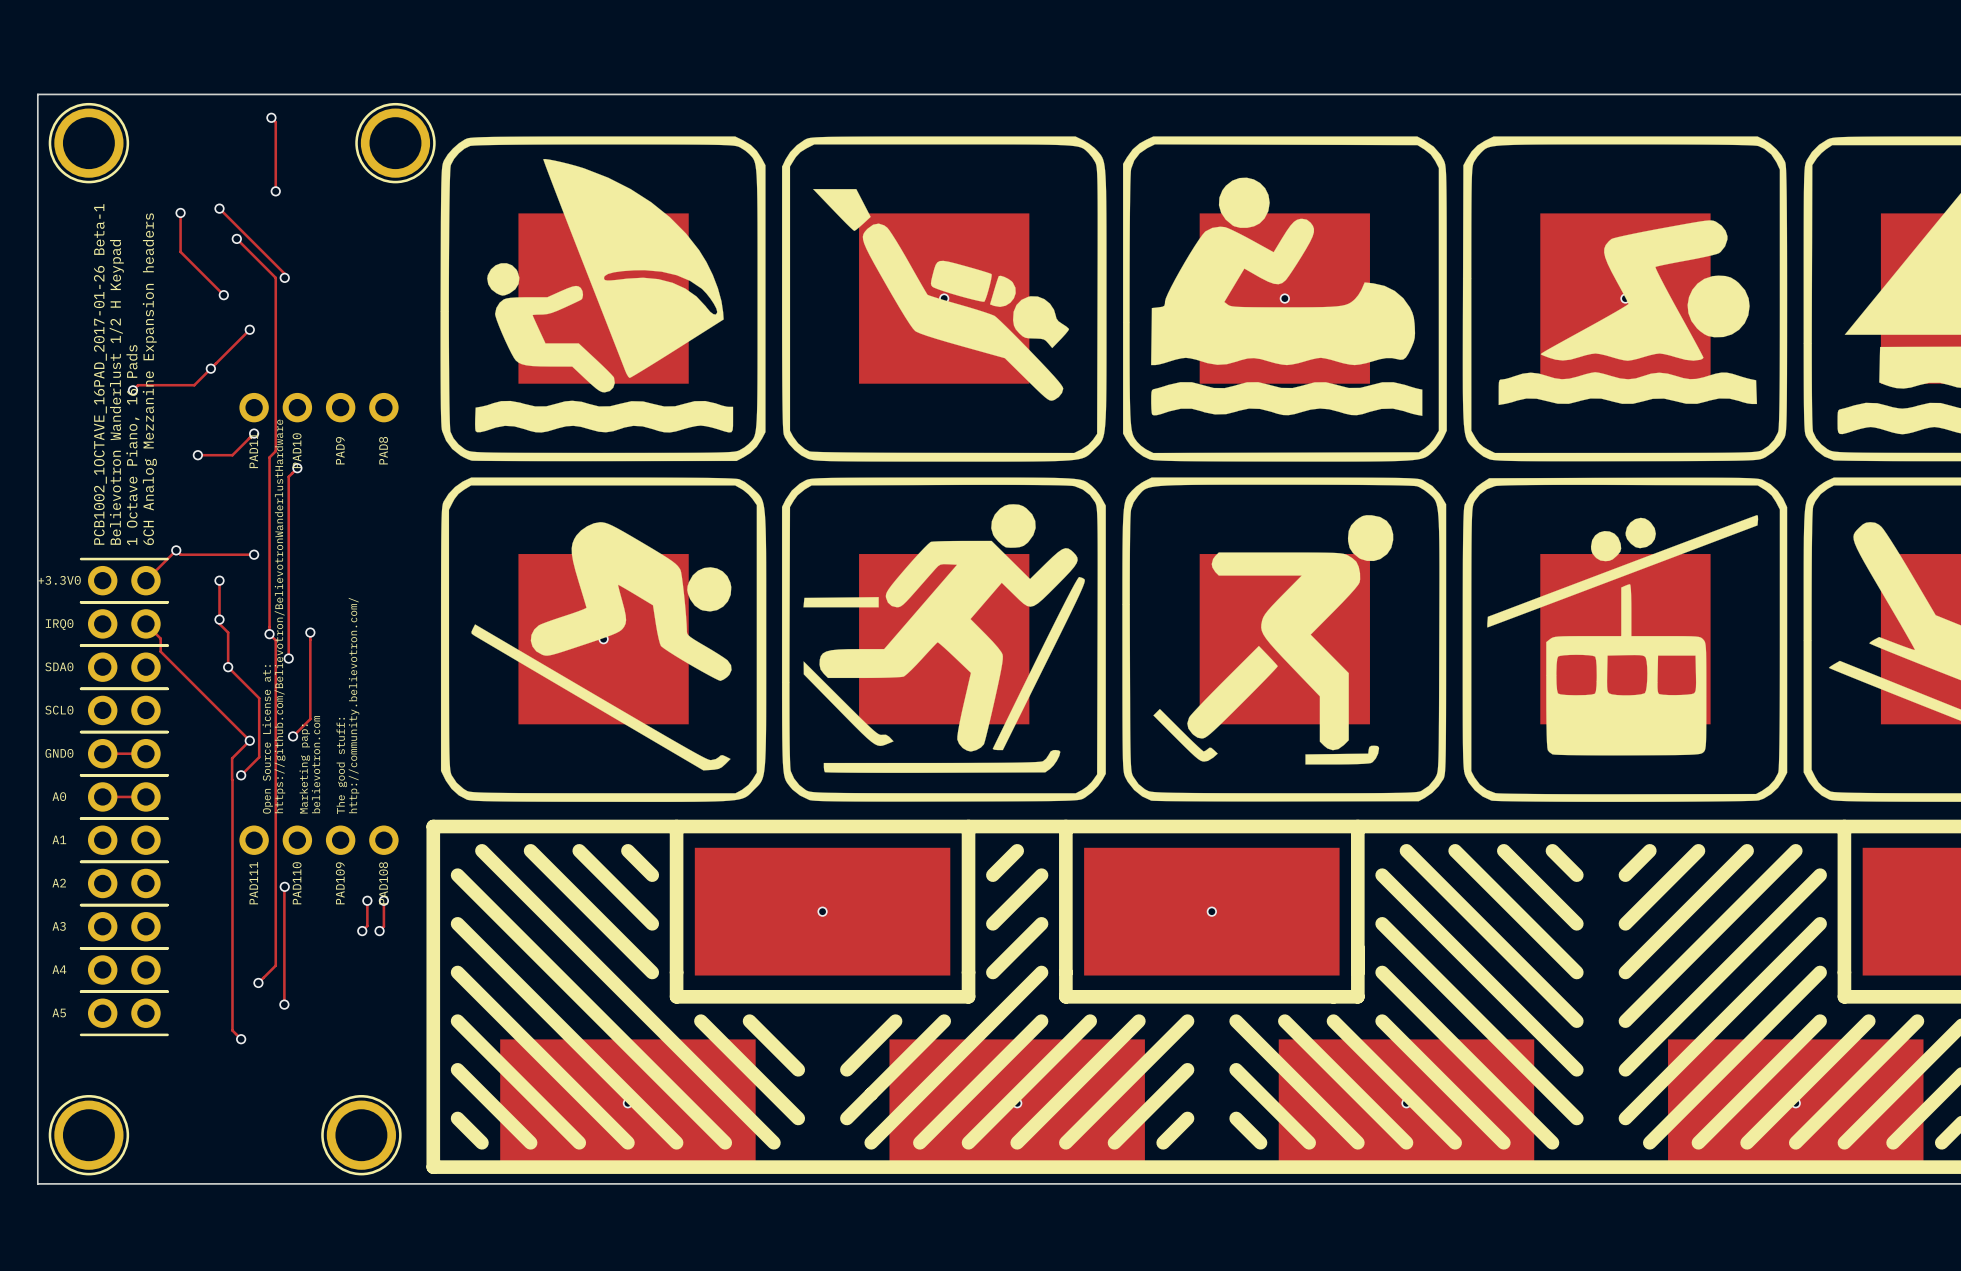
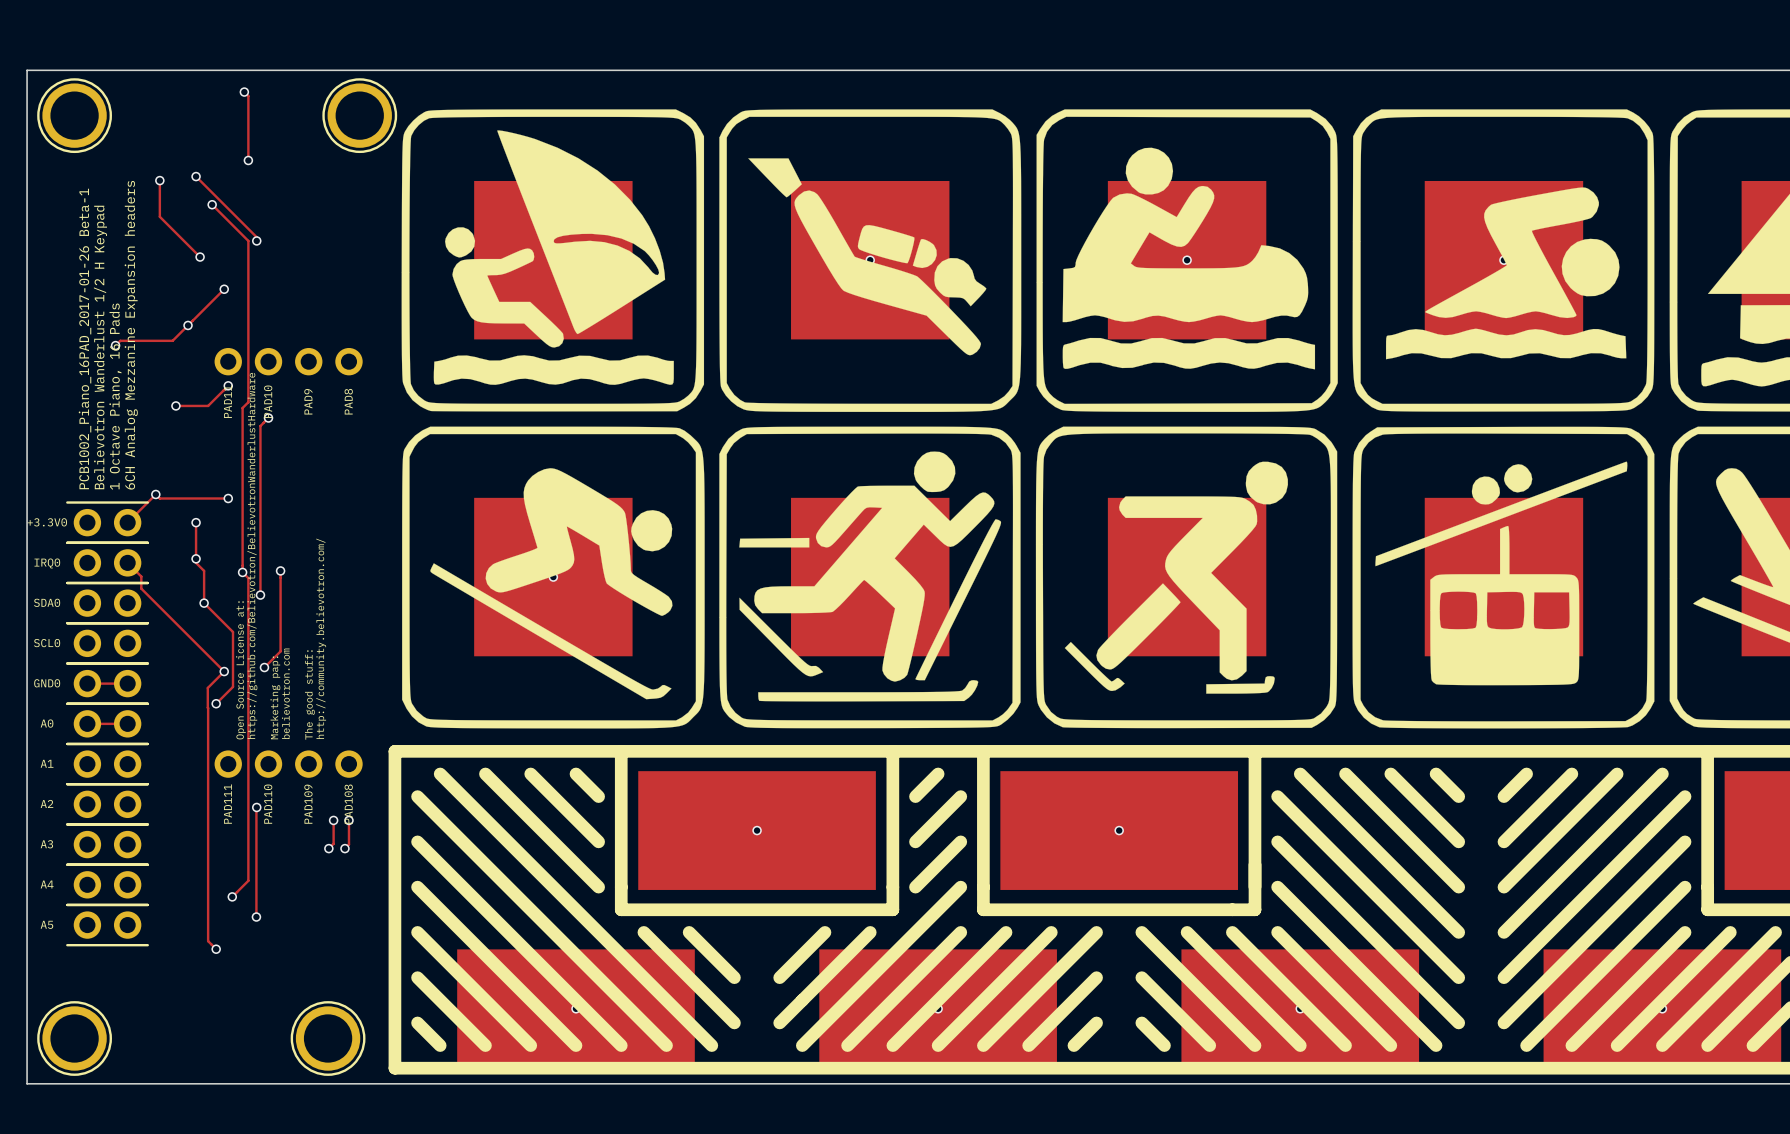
text: PCB1002_1OCTAVE_16PAD_2017-01-26 Beta-1 (100, 374) -> PCB1002_Piano_16PAD_2017-01-26 Beta-1 (85, 338)

